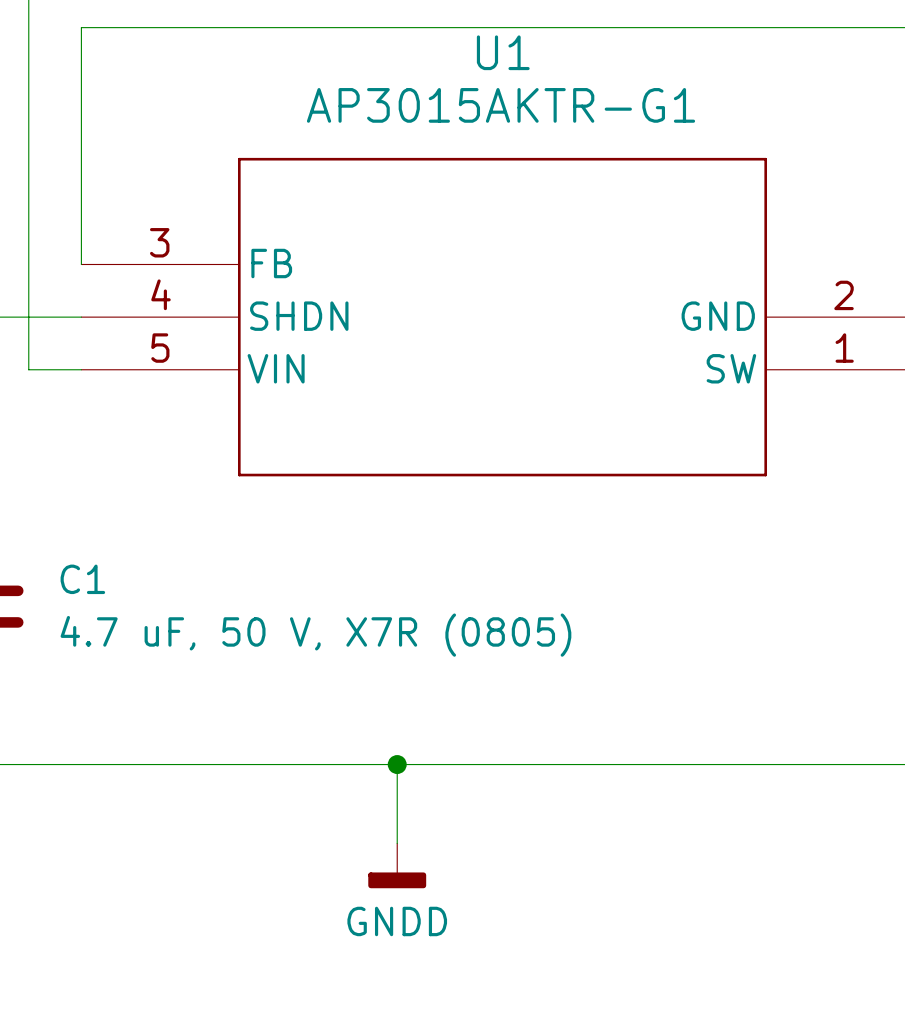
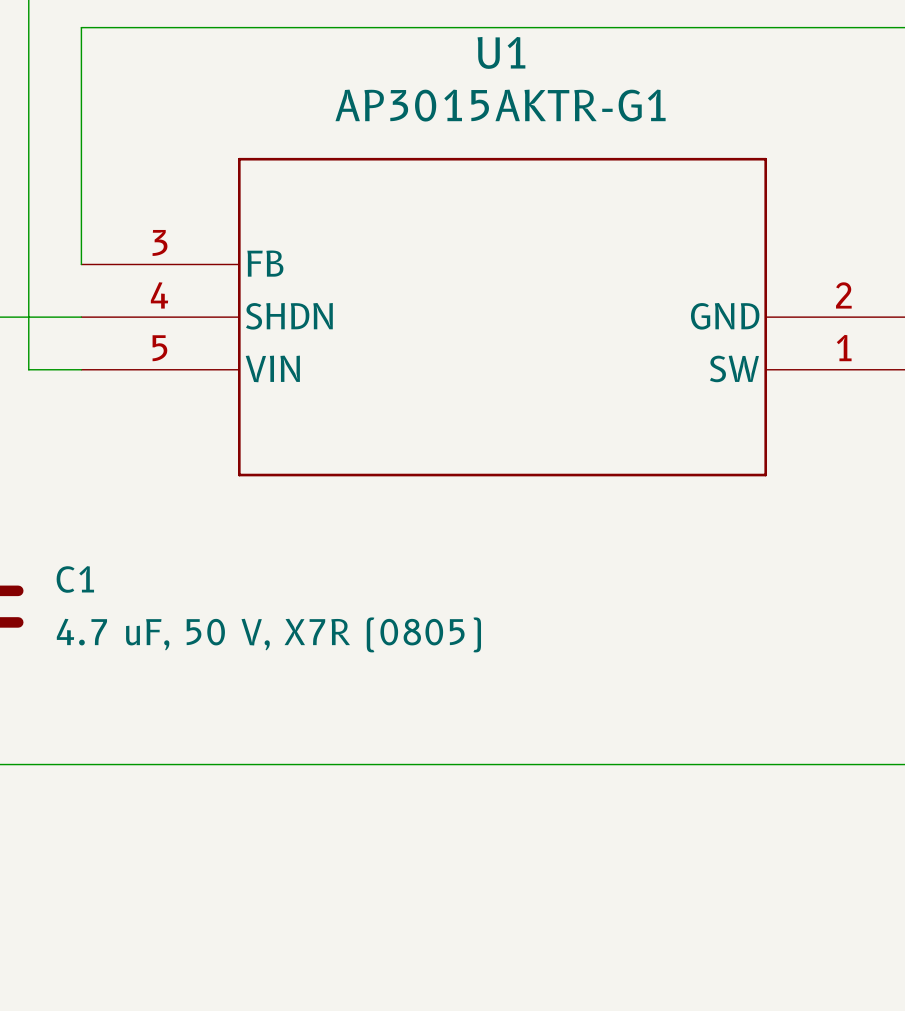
wire: (397, 764) (397, 843) -> none
junction: (397, 764) -> none
power symbol: GNDD (397, 865) -> none

